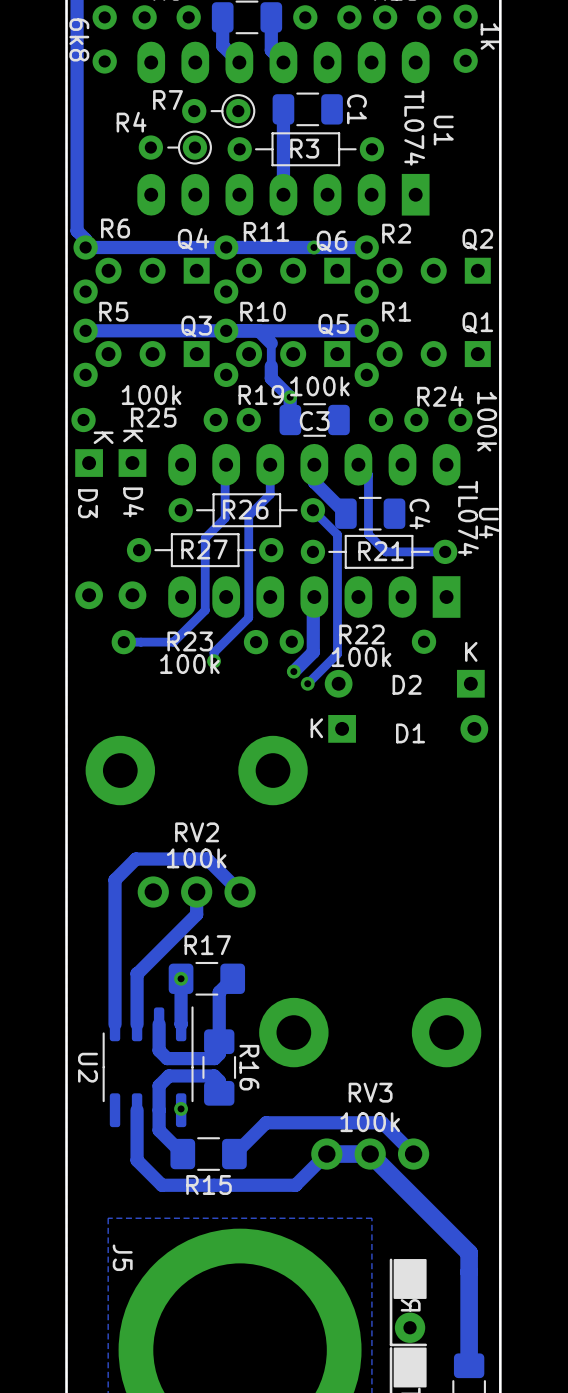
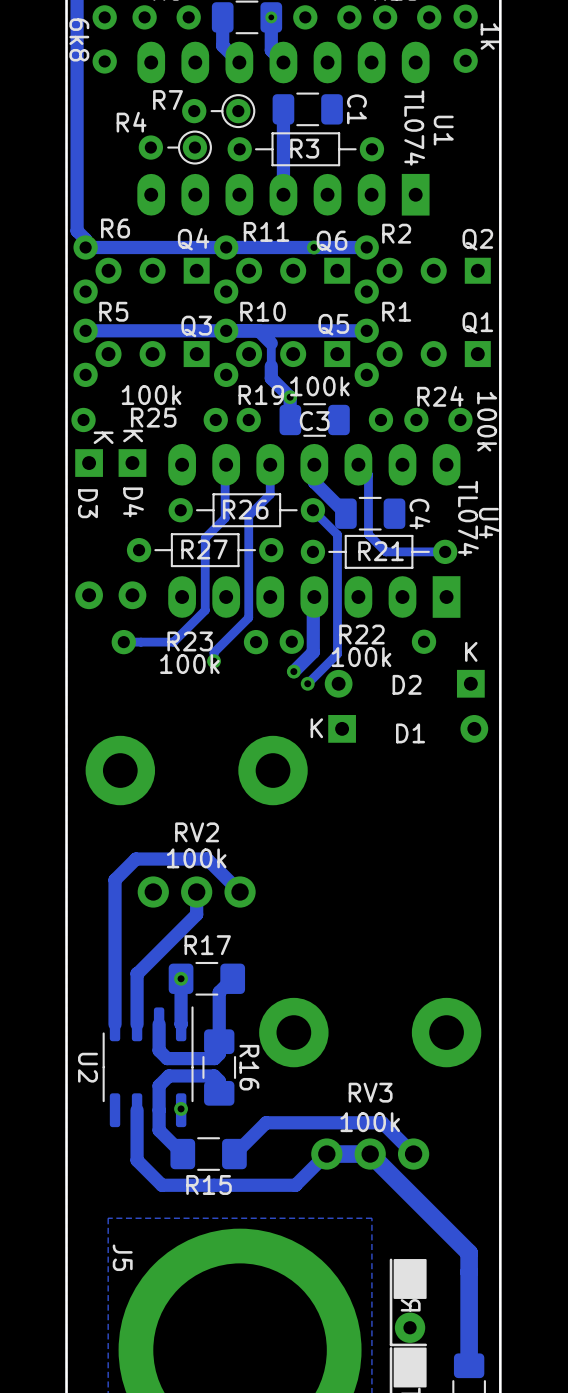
via: none -> (271, 17)

